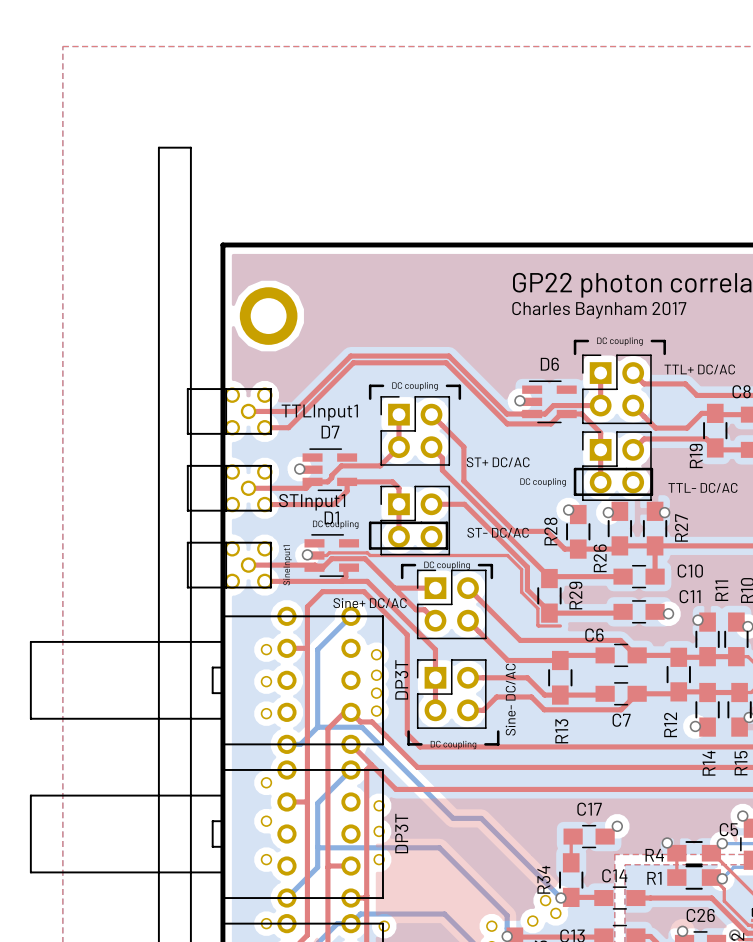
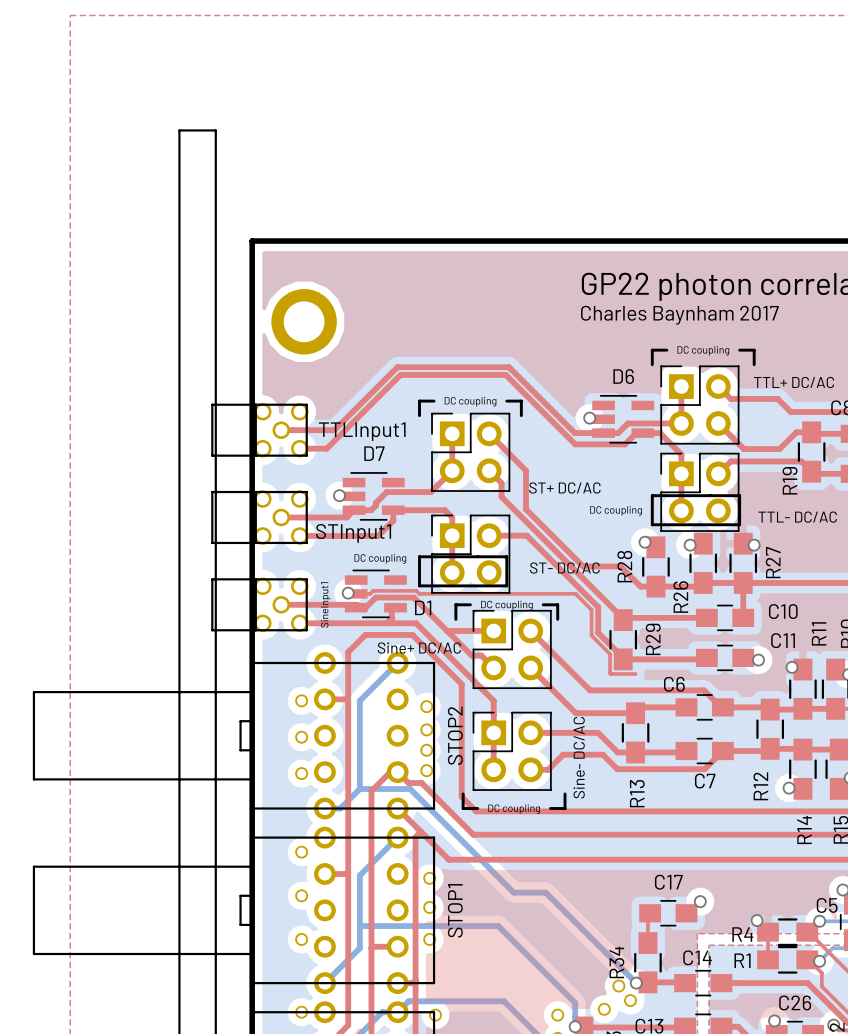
D1 name position: D1 (331, 517) -> D1 (423, 607)
STOP2 value: DP3T (401, 679) -> none
STOP2 name: none -> STOP2 (455, 735)
STOP1 value: DP3T (401, 833) -> none
STOP1 name: none -> STOP1 (455, 910)

